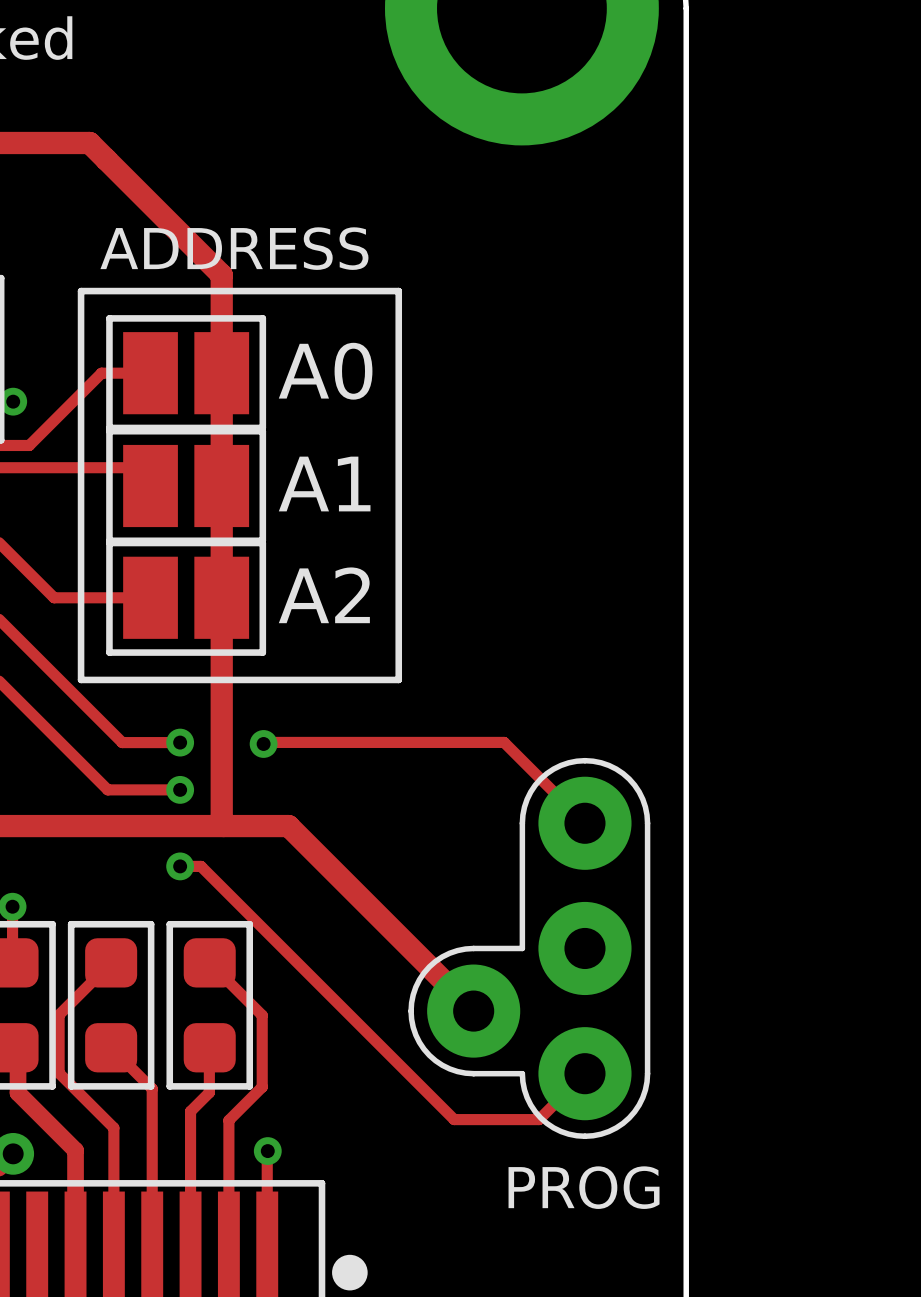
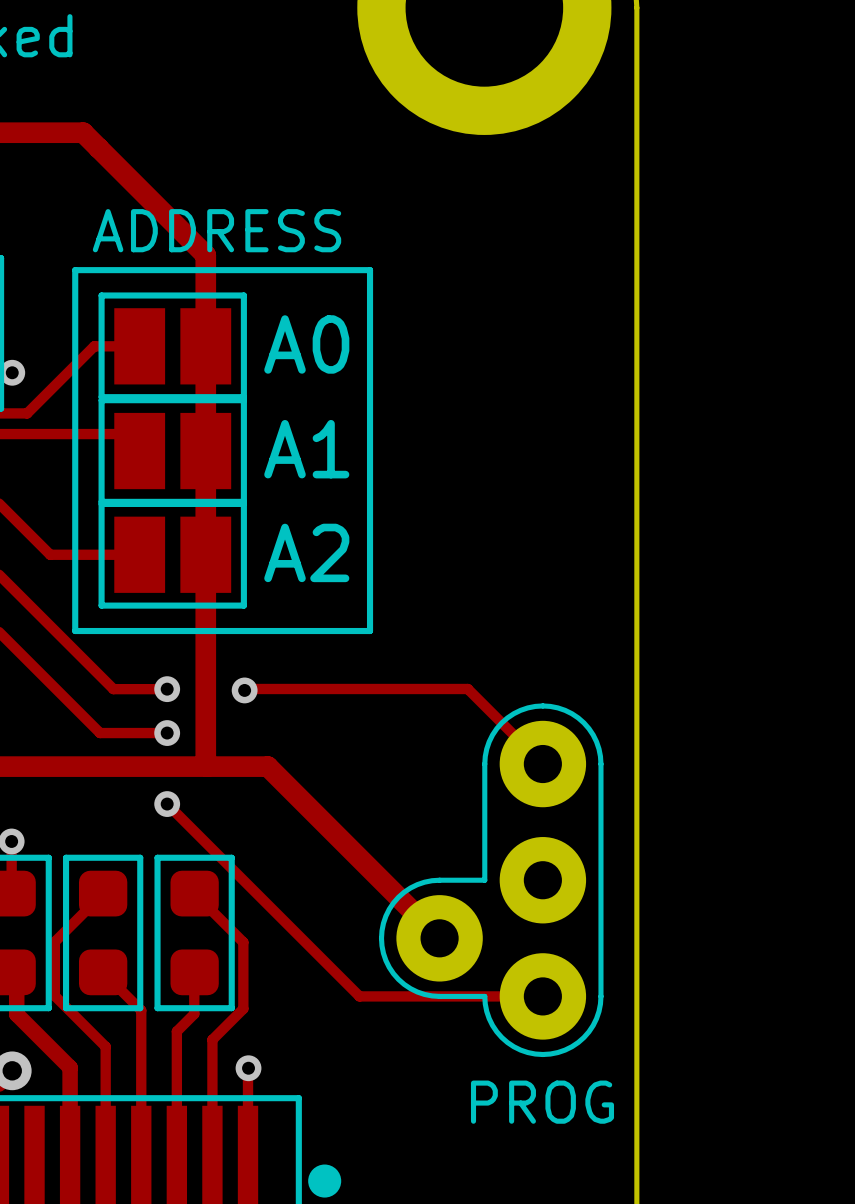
track: (180, 866) (201, 866) (454, 1119) (539, 1119) (584, 1073) -> (167, 804) (359, 996) (542, 996)

